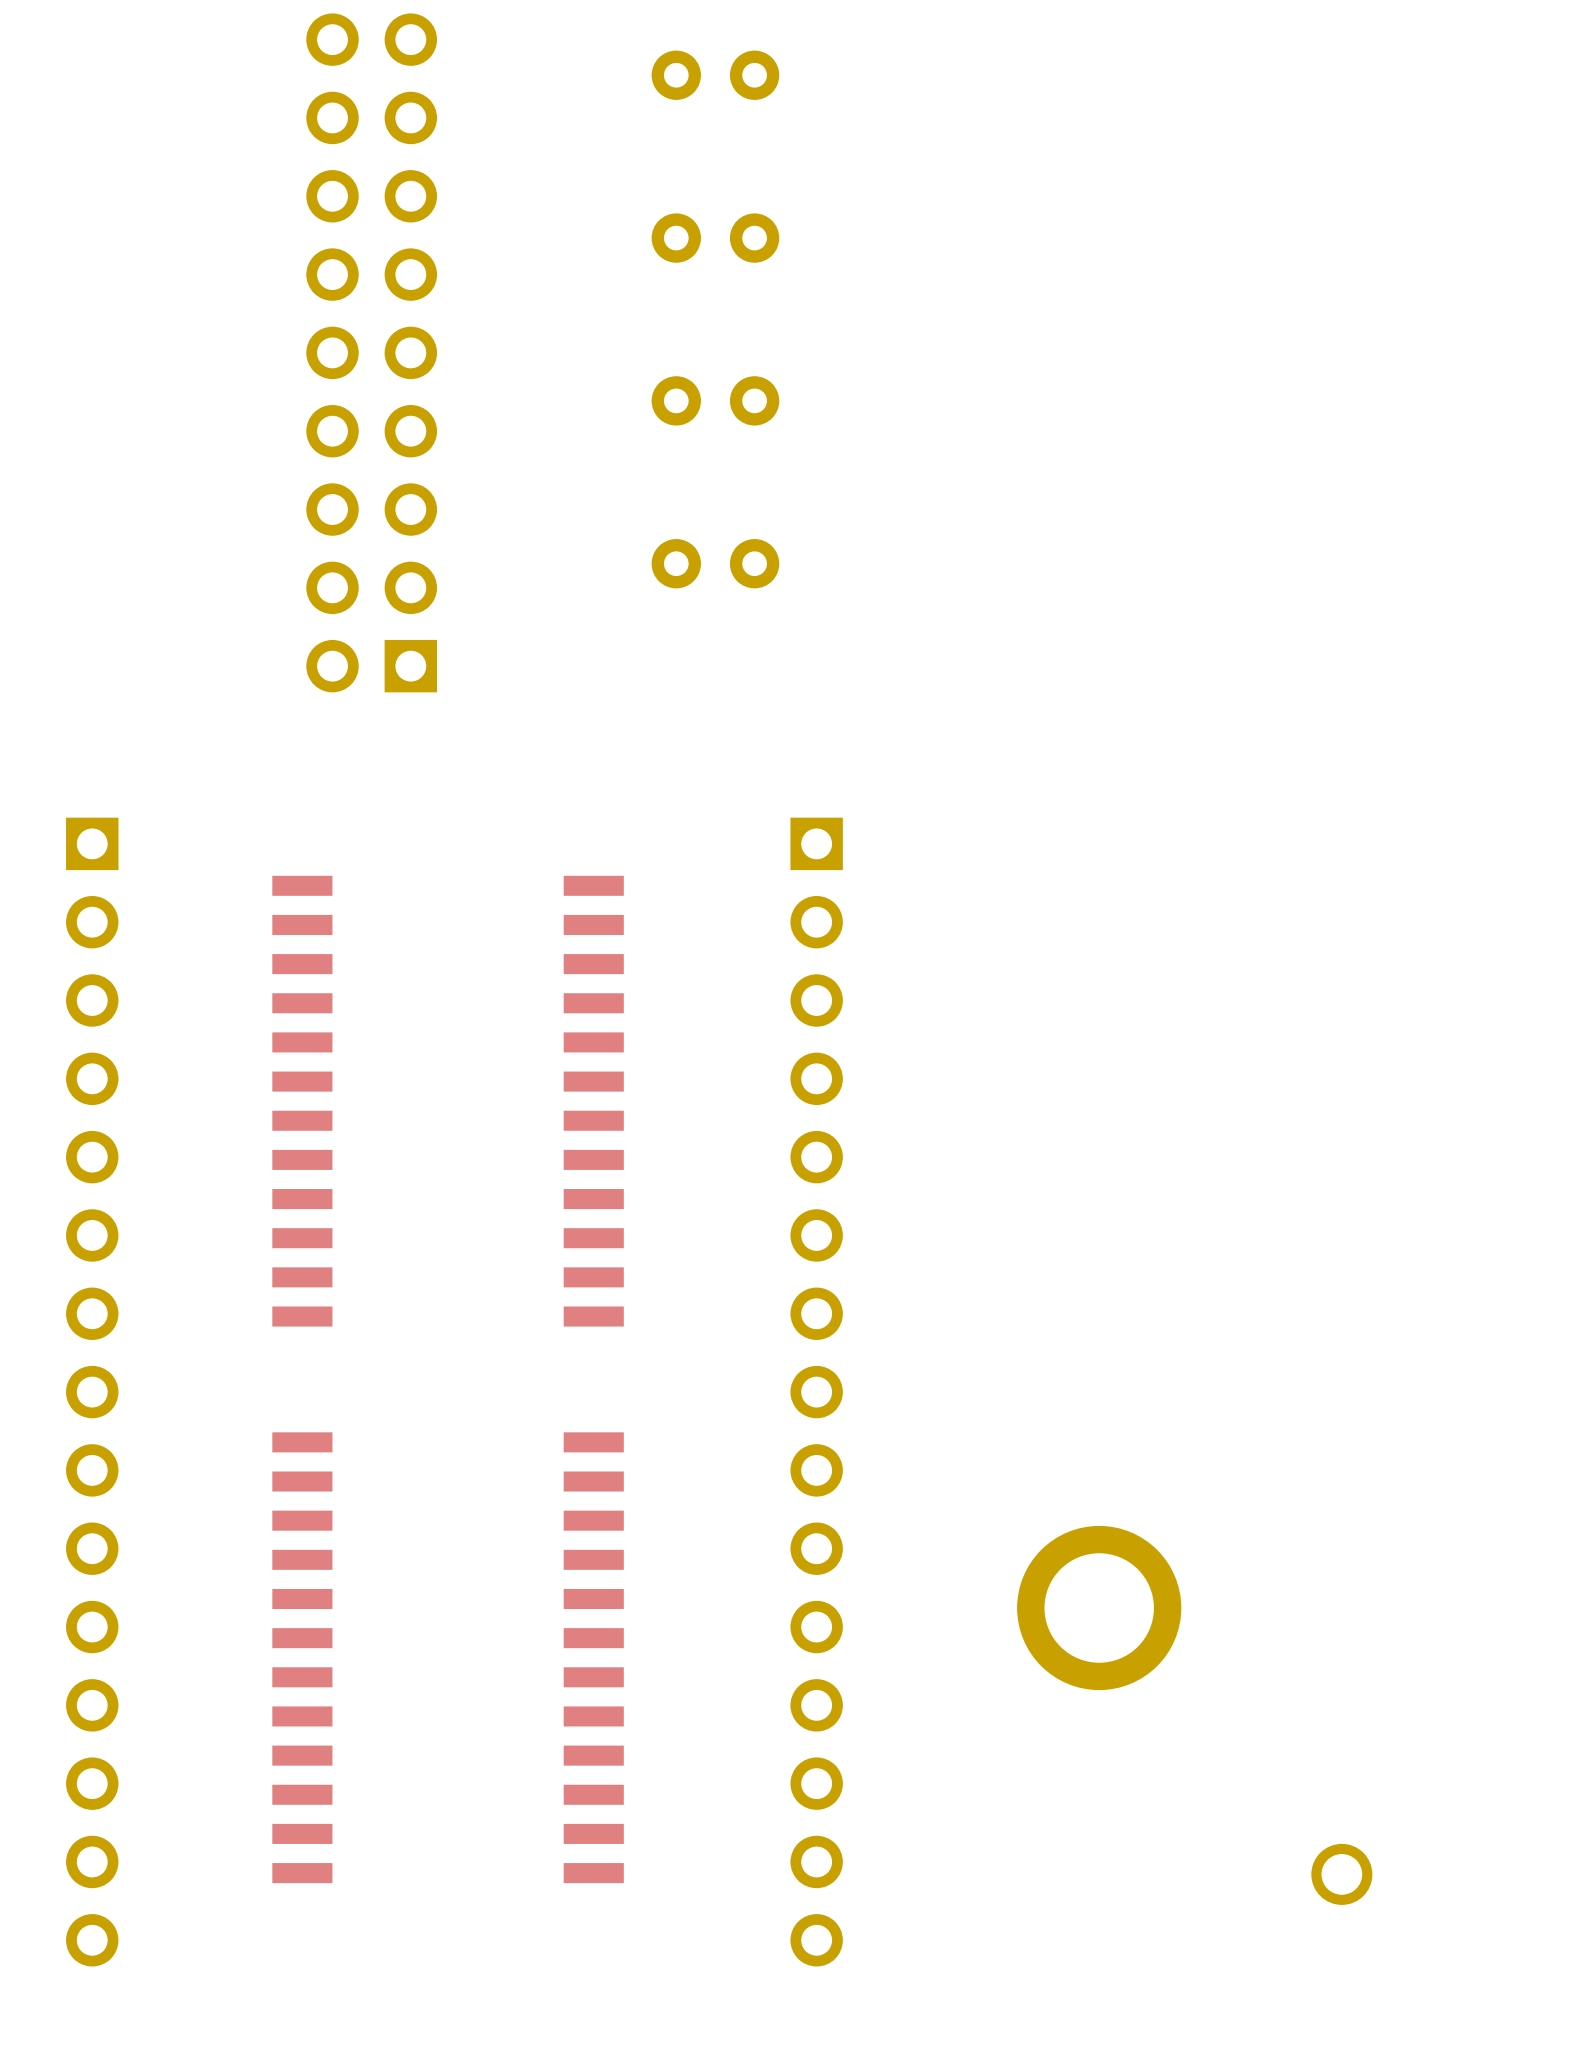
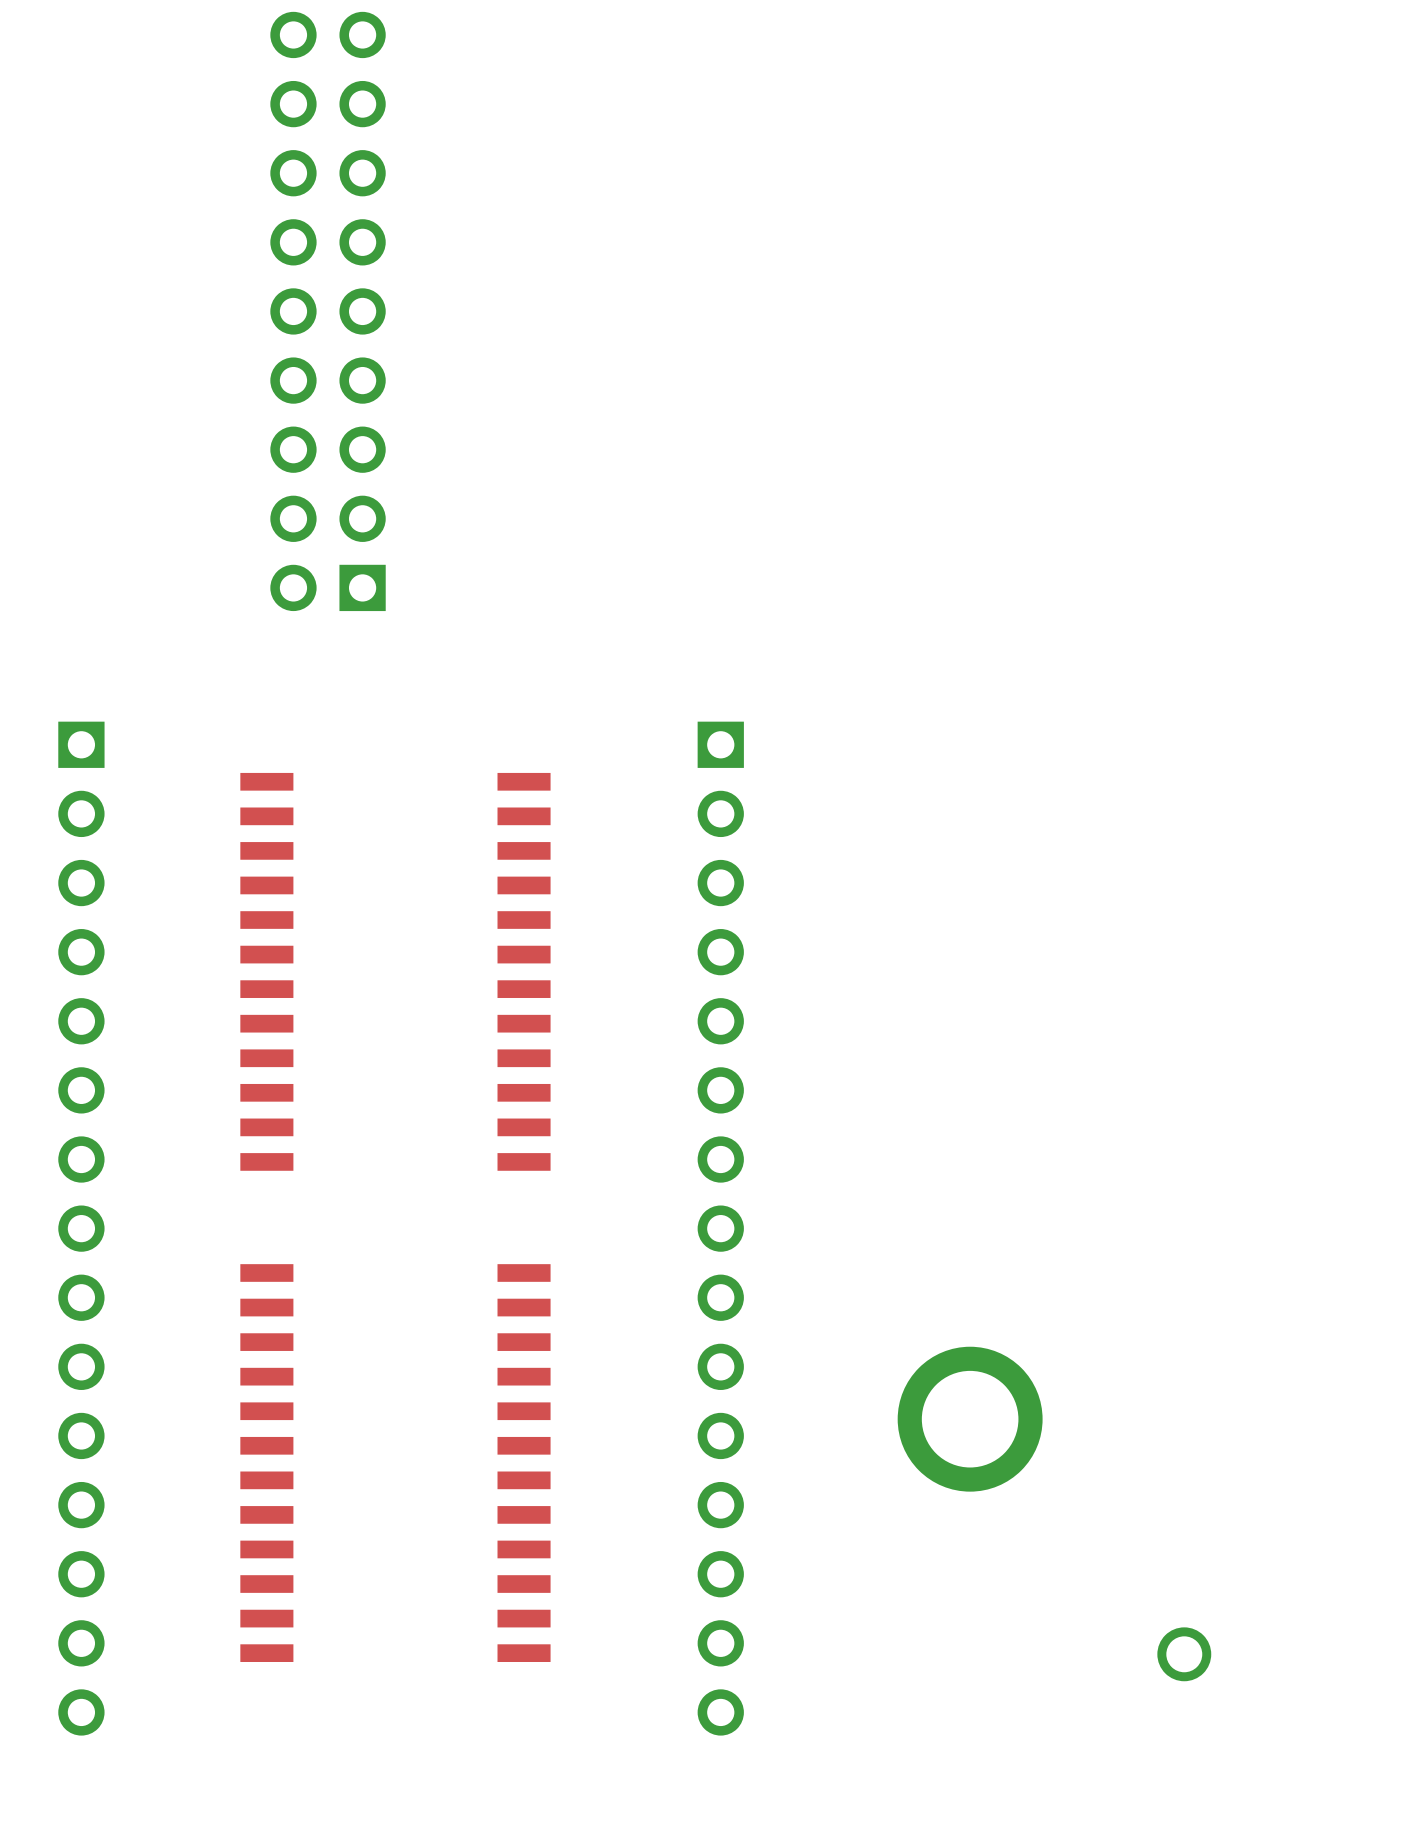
part: (715, 75) -> none
part: (715, 238) -> none
part: (715, 400) -> none
part: (715, 563) -> none

